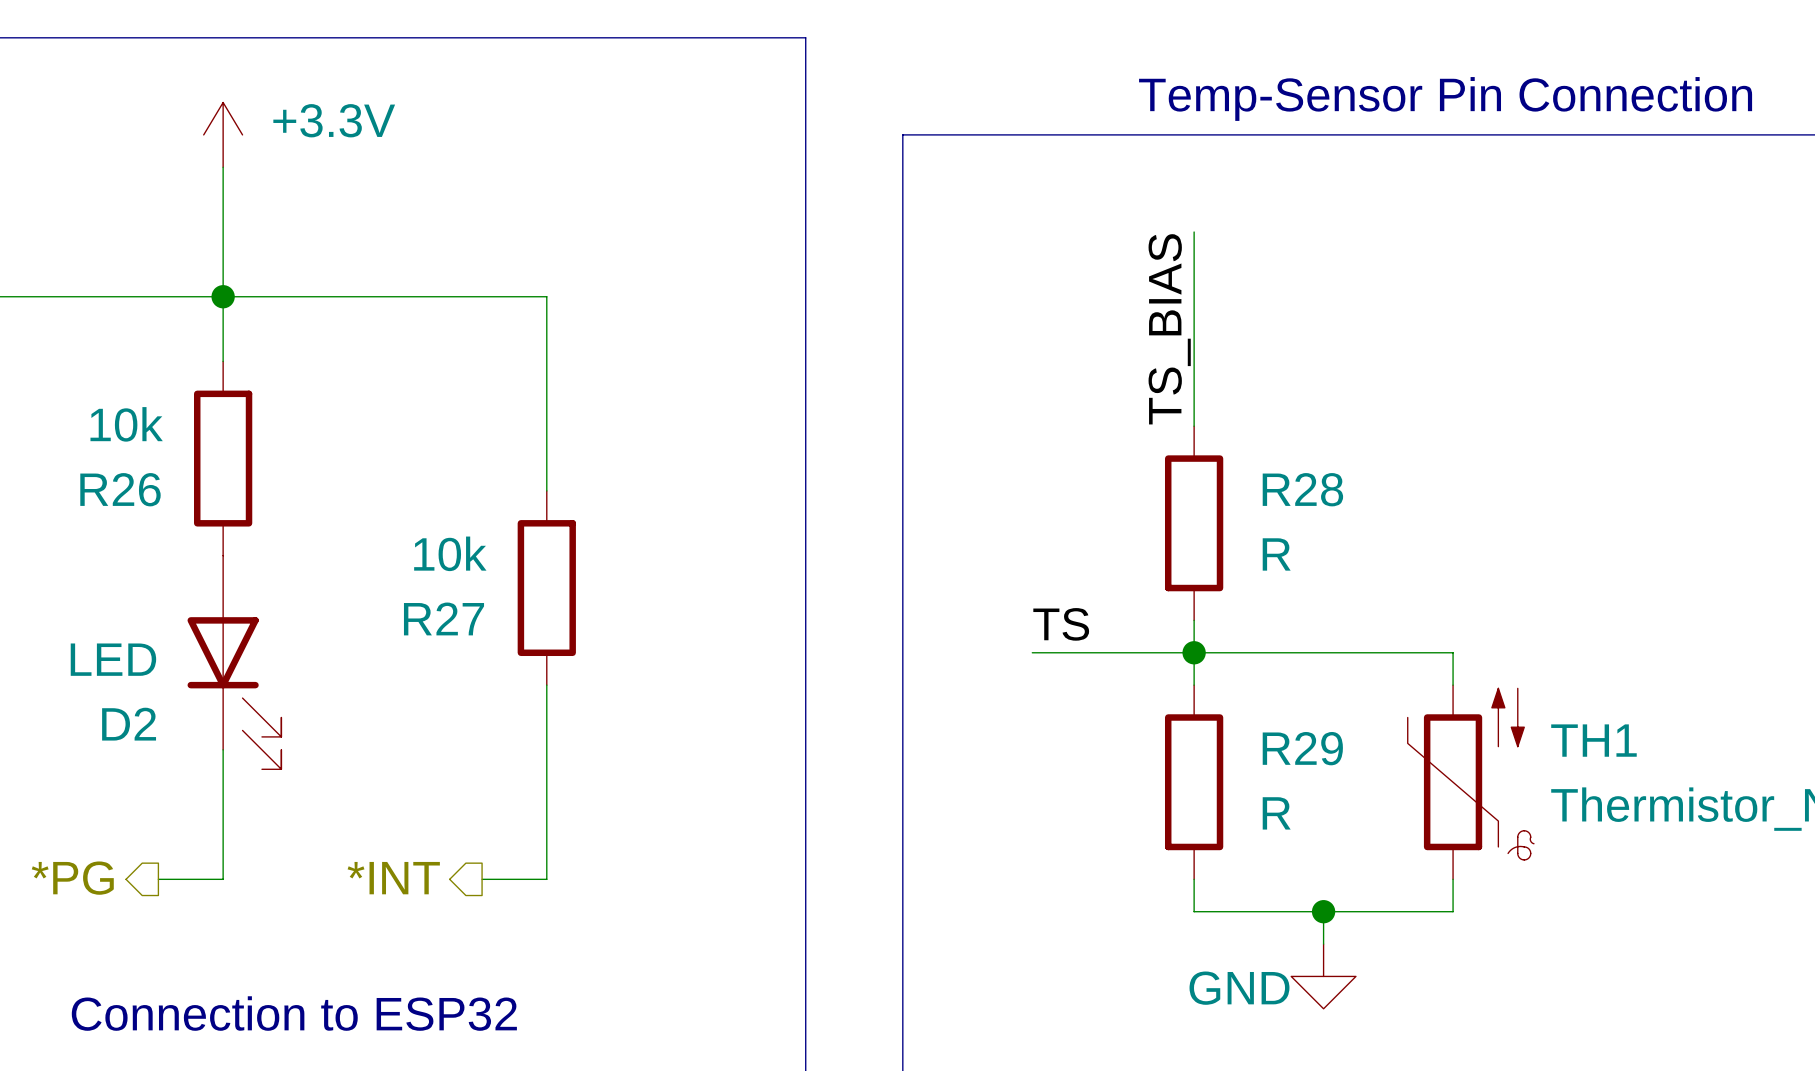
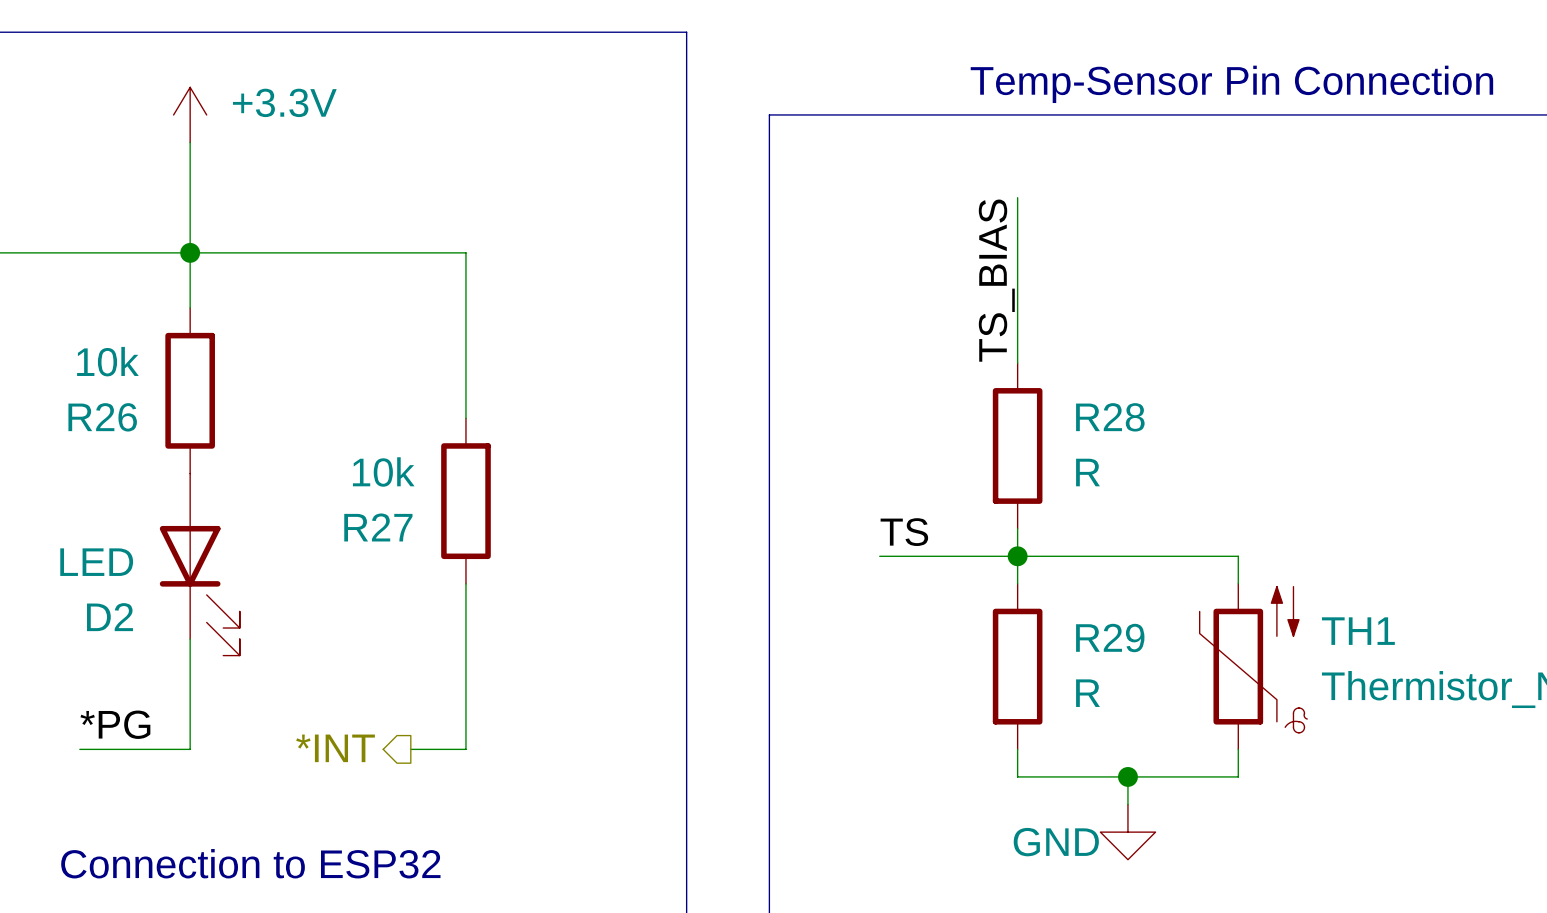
label: none -> *PG (115, 724)
hierarchical label: *PG (72, 878) -> none
wire: none -> (79, 749) (134, 749)

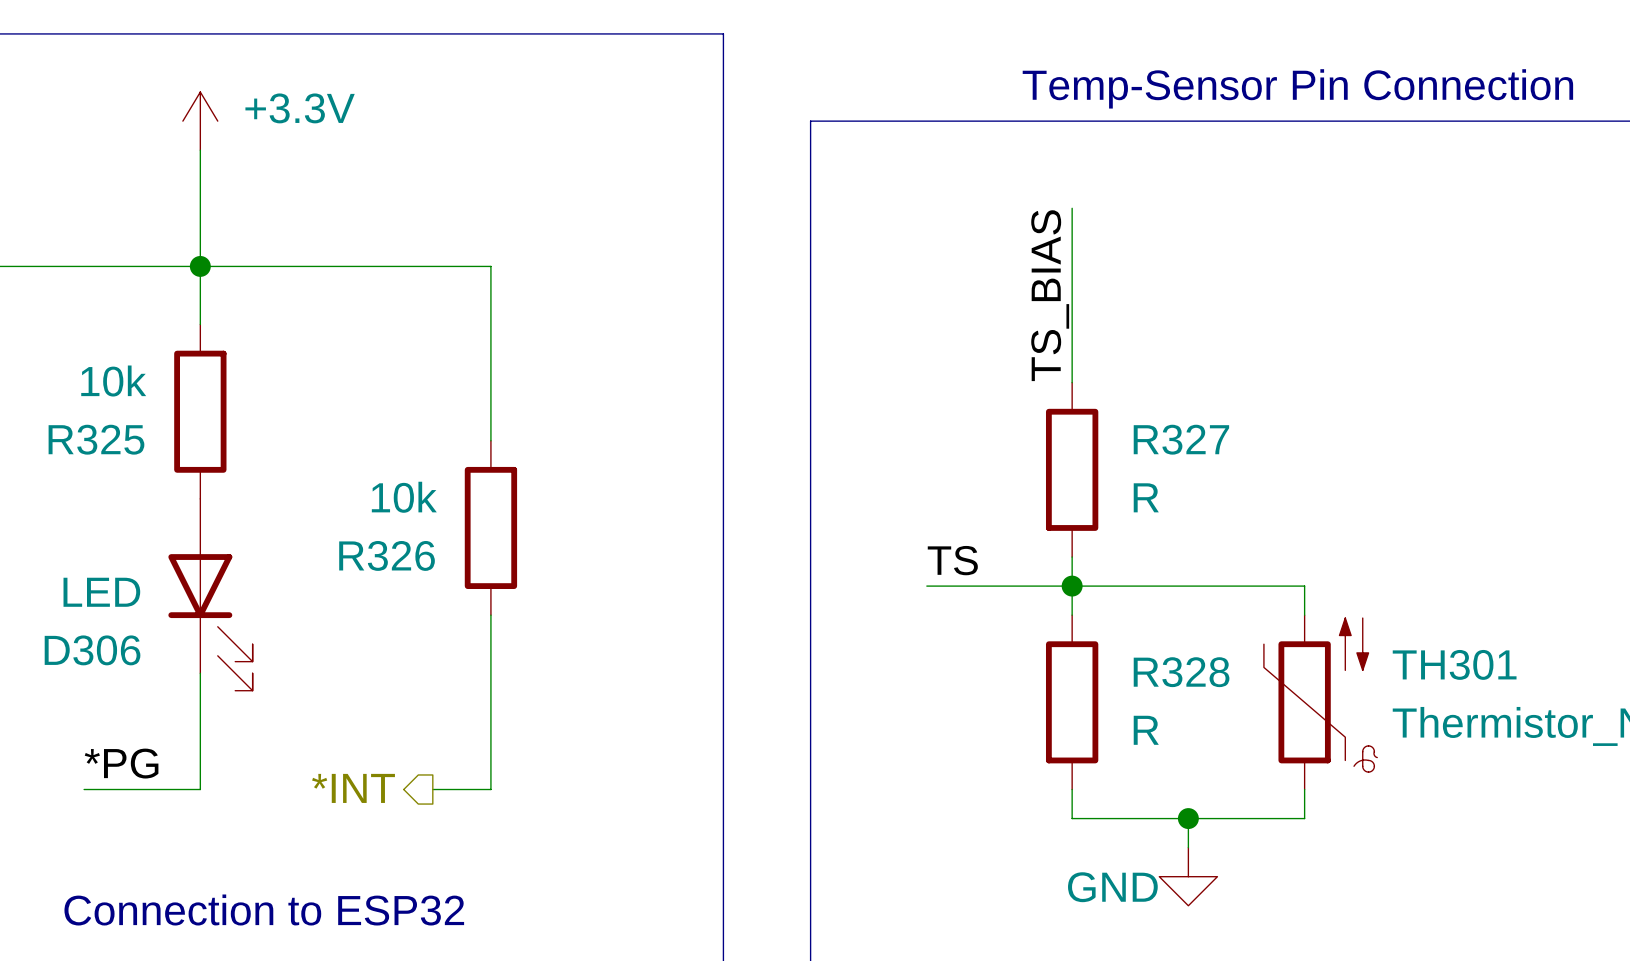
R26 name: R26 (102, 417) -> R325 (96, 439)
R28 name: R28 (1110, 417) -> R327 (1181, 439)
R27 name: R27 (378, 527) -> R326 (387, 555)
D2 name: D2 (110, 617) -> D306 (92, 650)
TH1 name: TH1 (1358, 631) -> TH301 (1454, 664)
R29 name: R29 (1110, 638) -> R328 (1181, 672)

